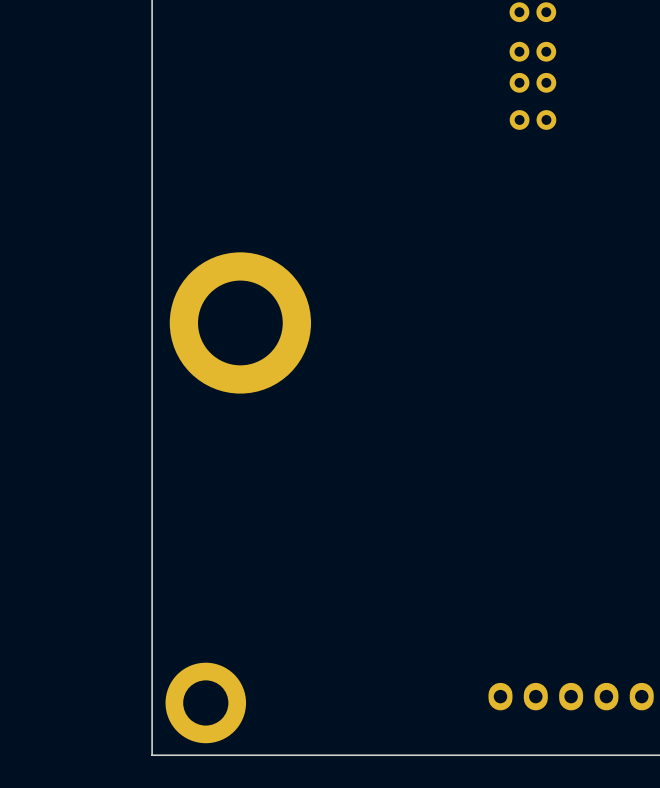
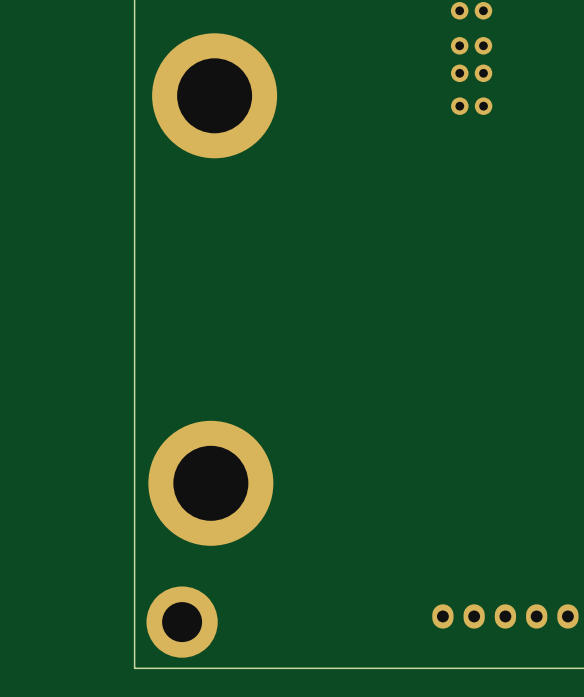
part: none -> (214, 95)
part: (240, 322) -> none
part: none -> (210, 483)

